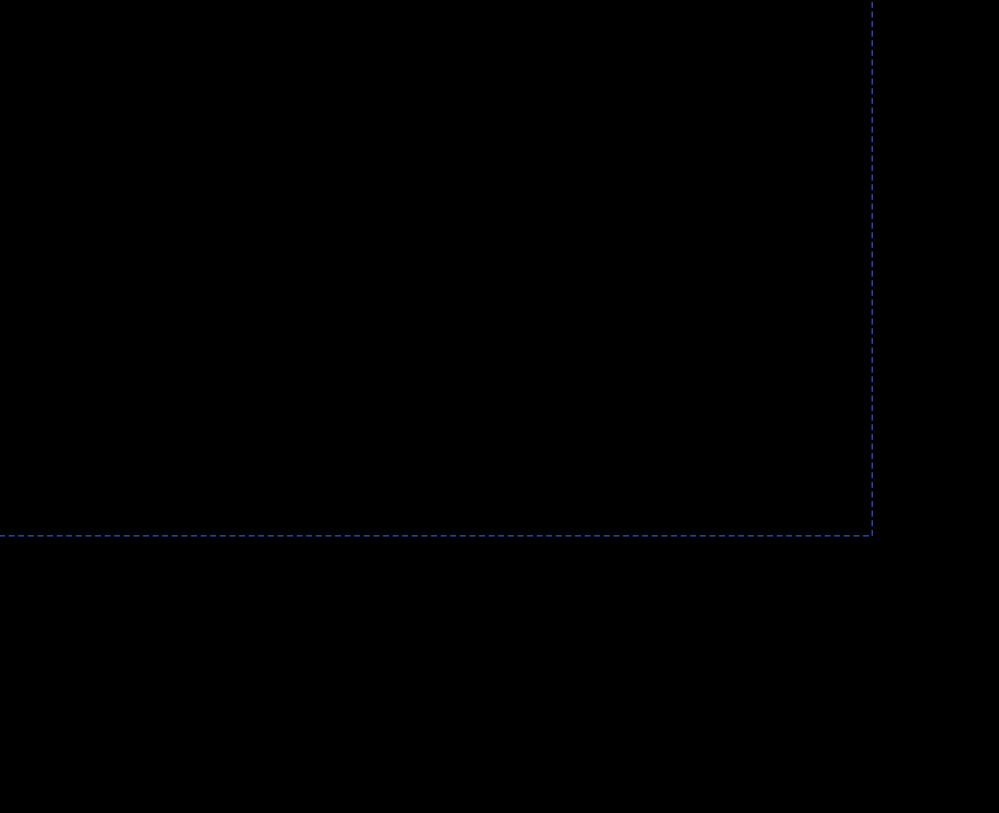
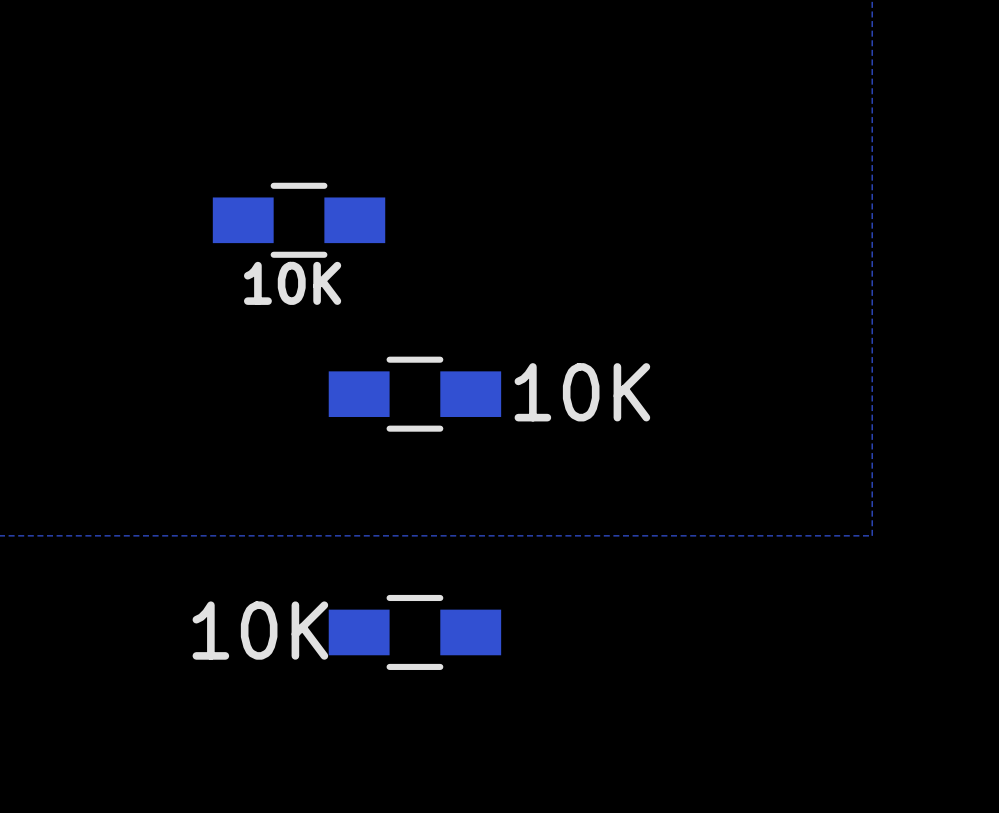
part: none -> 10K (299, 220)
part: none -> 10K (414, 394)
part: none -> 10K (414, 632)

